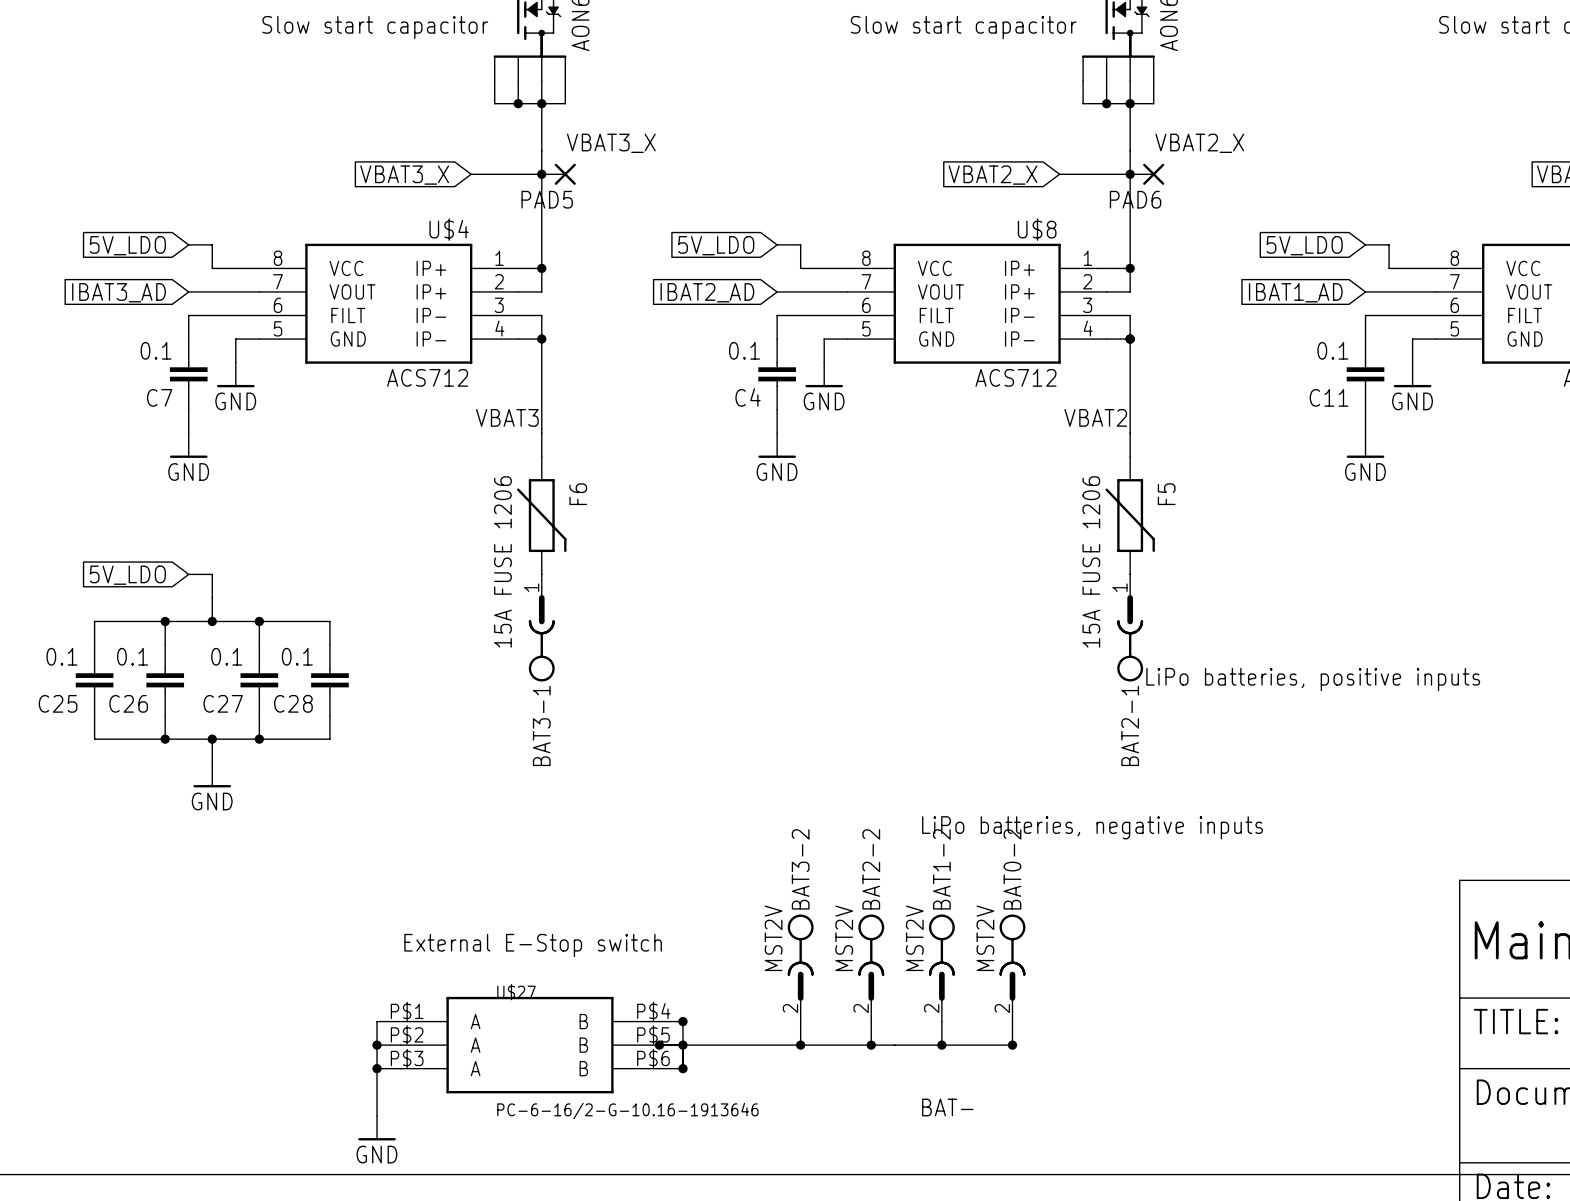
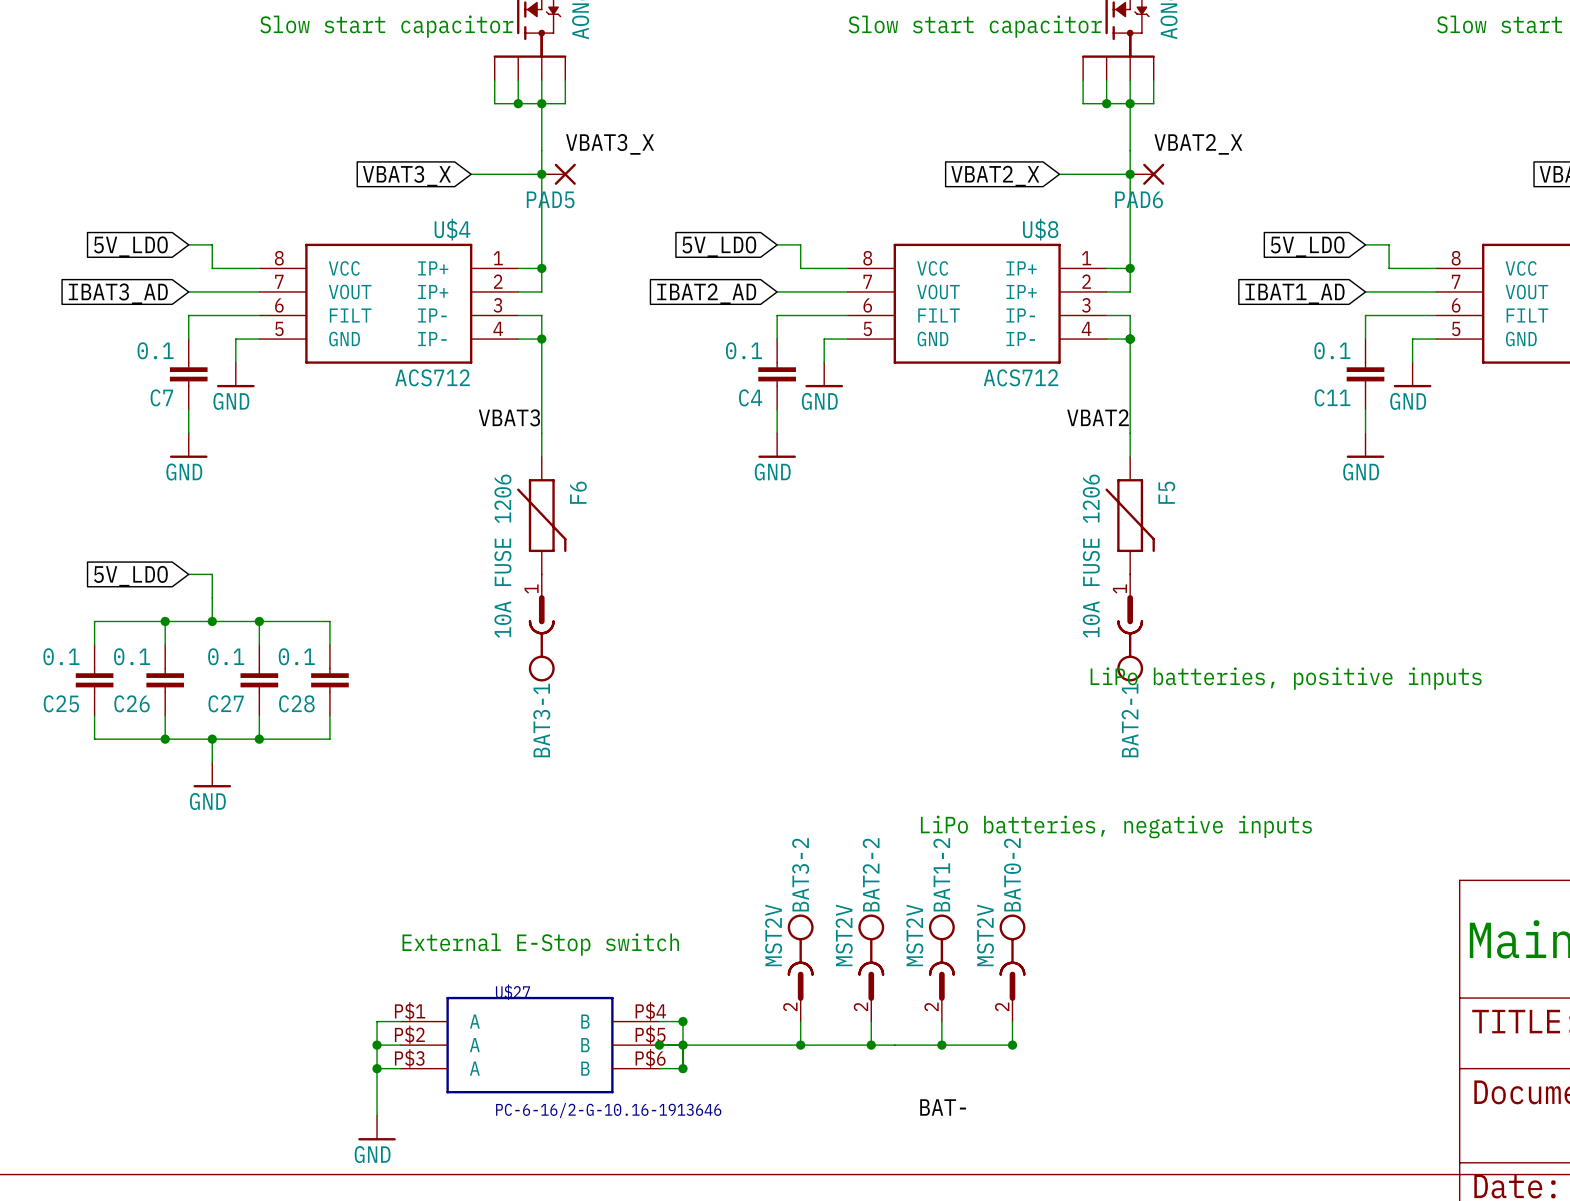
F6 value: 15A FUSE 1206 (502, 561) -> 10A FUSE 1206 (502, 556)
F5 value: 15A FUSE 1206 (1091, 561) -> 10A FUSE 1206 (1091, 556)

